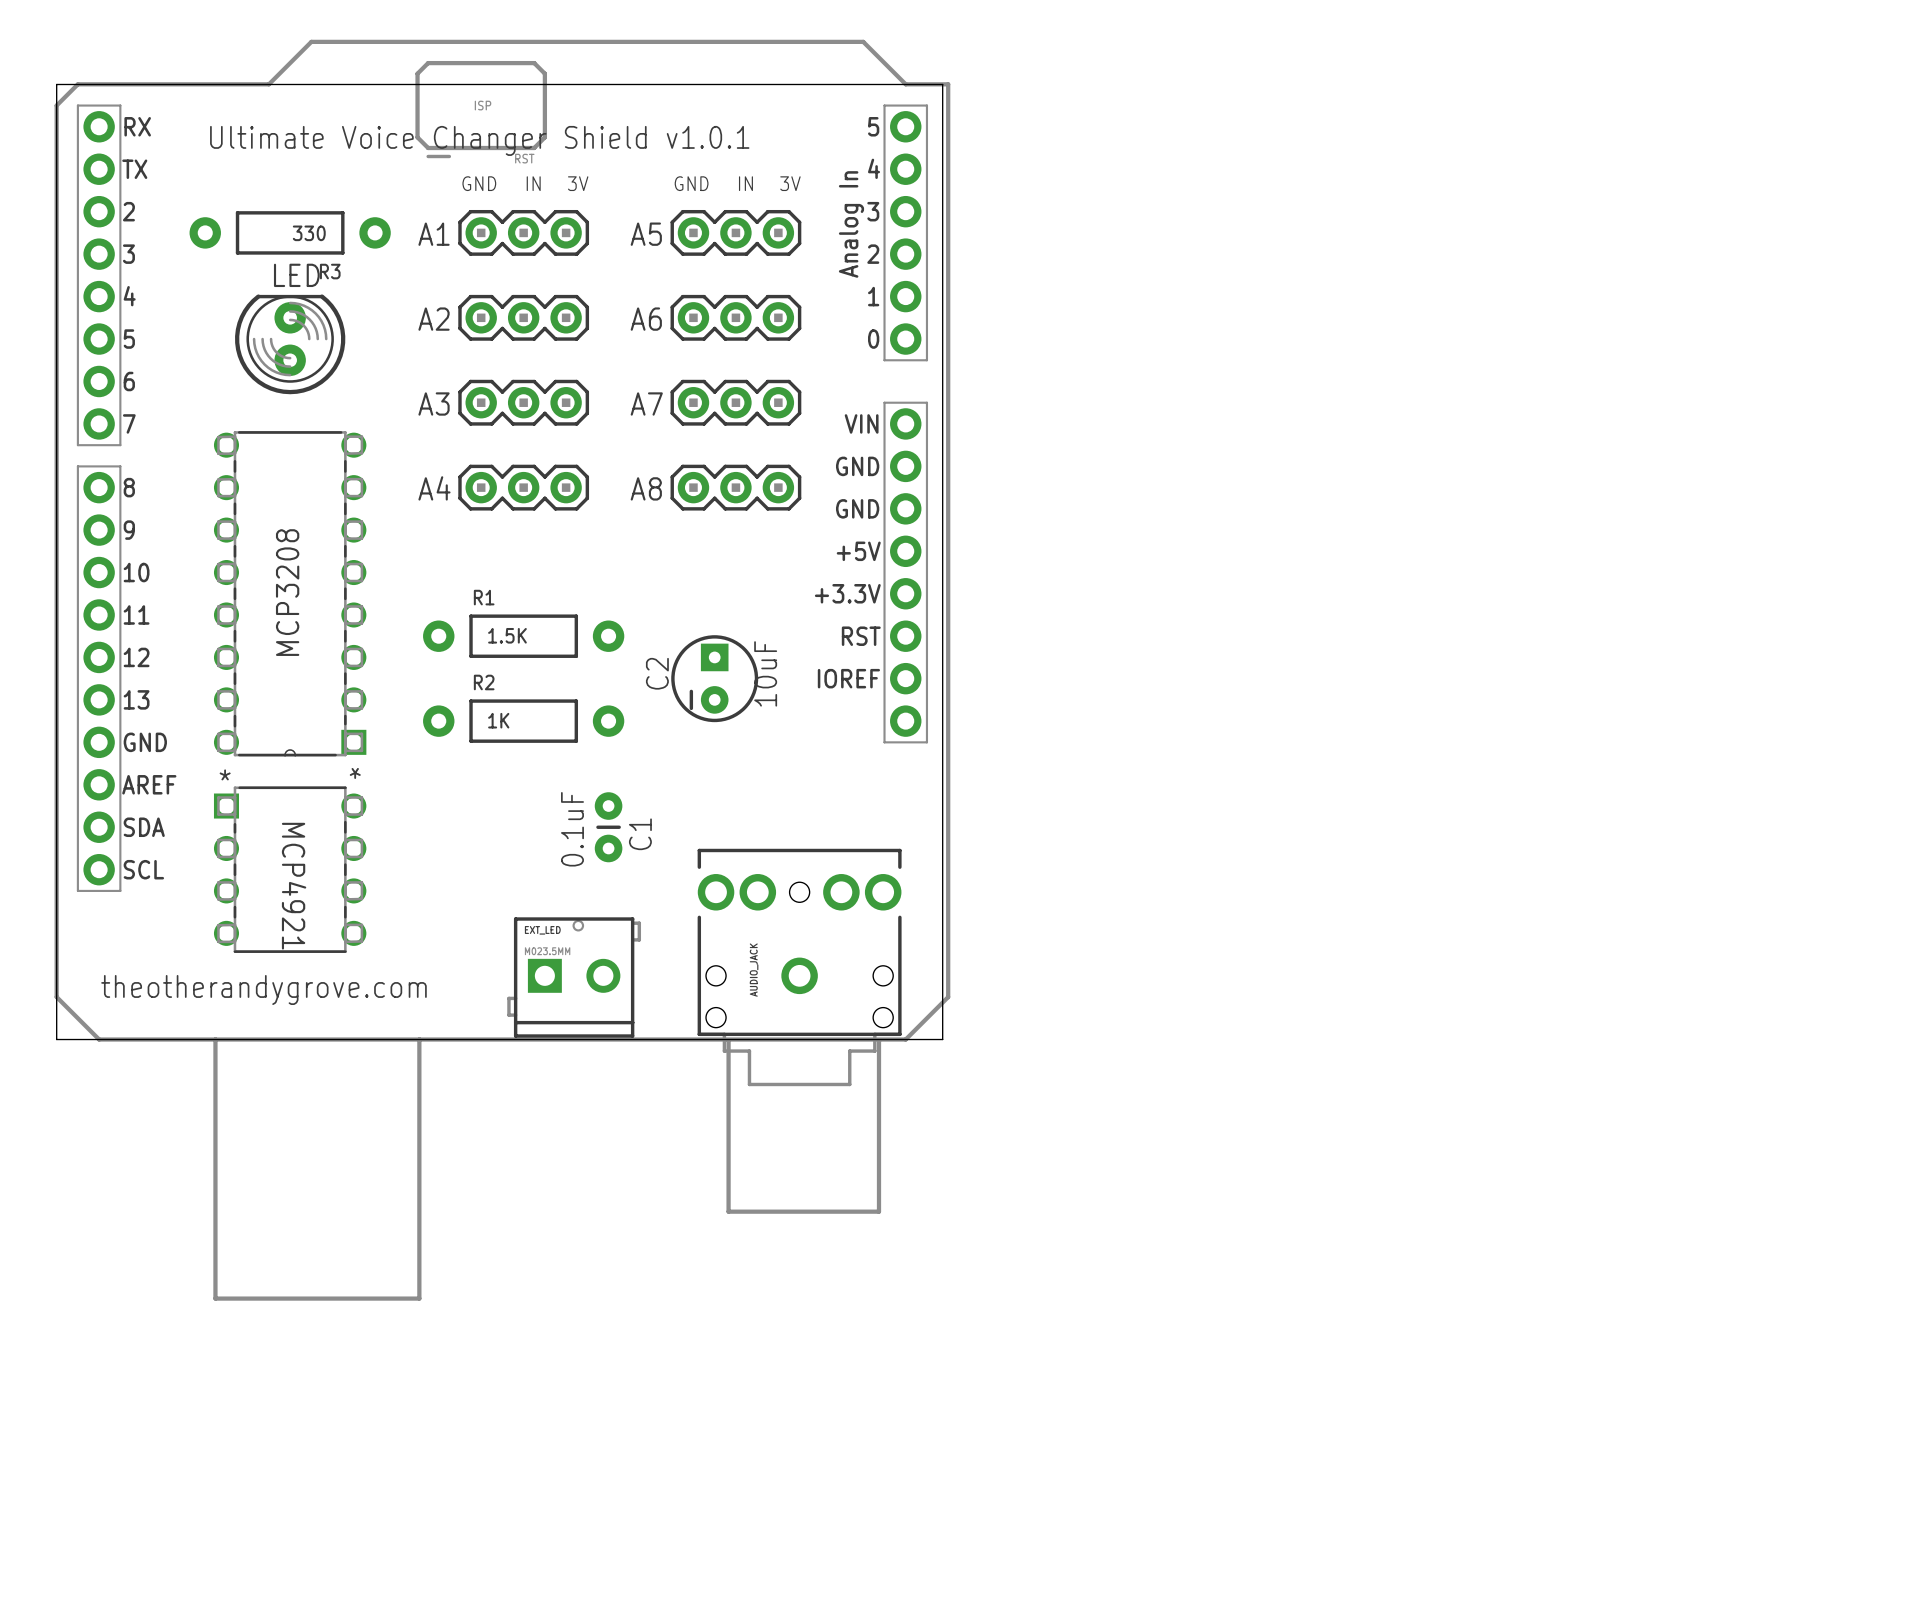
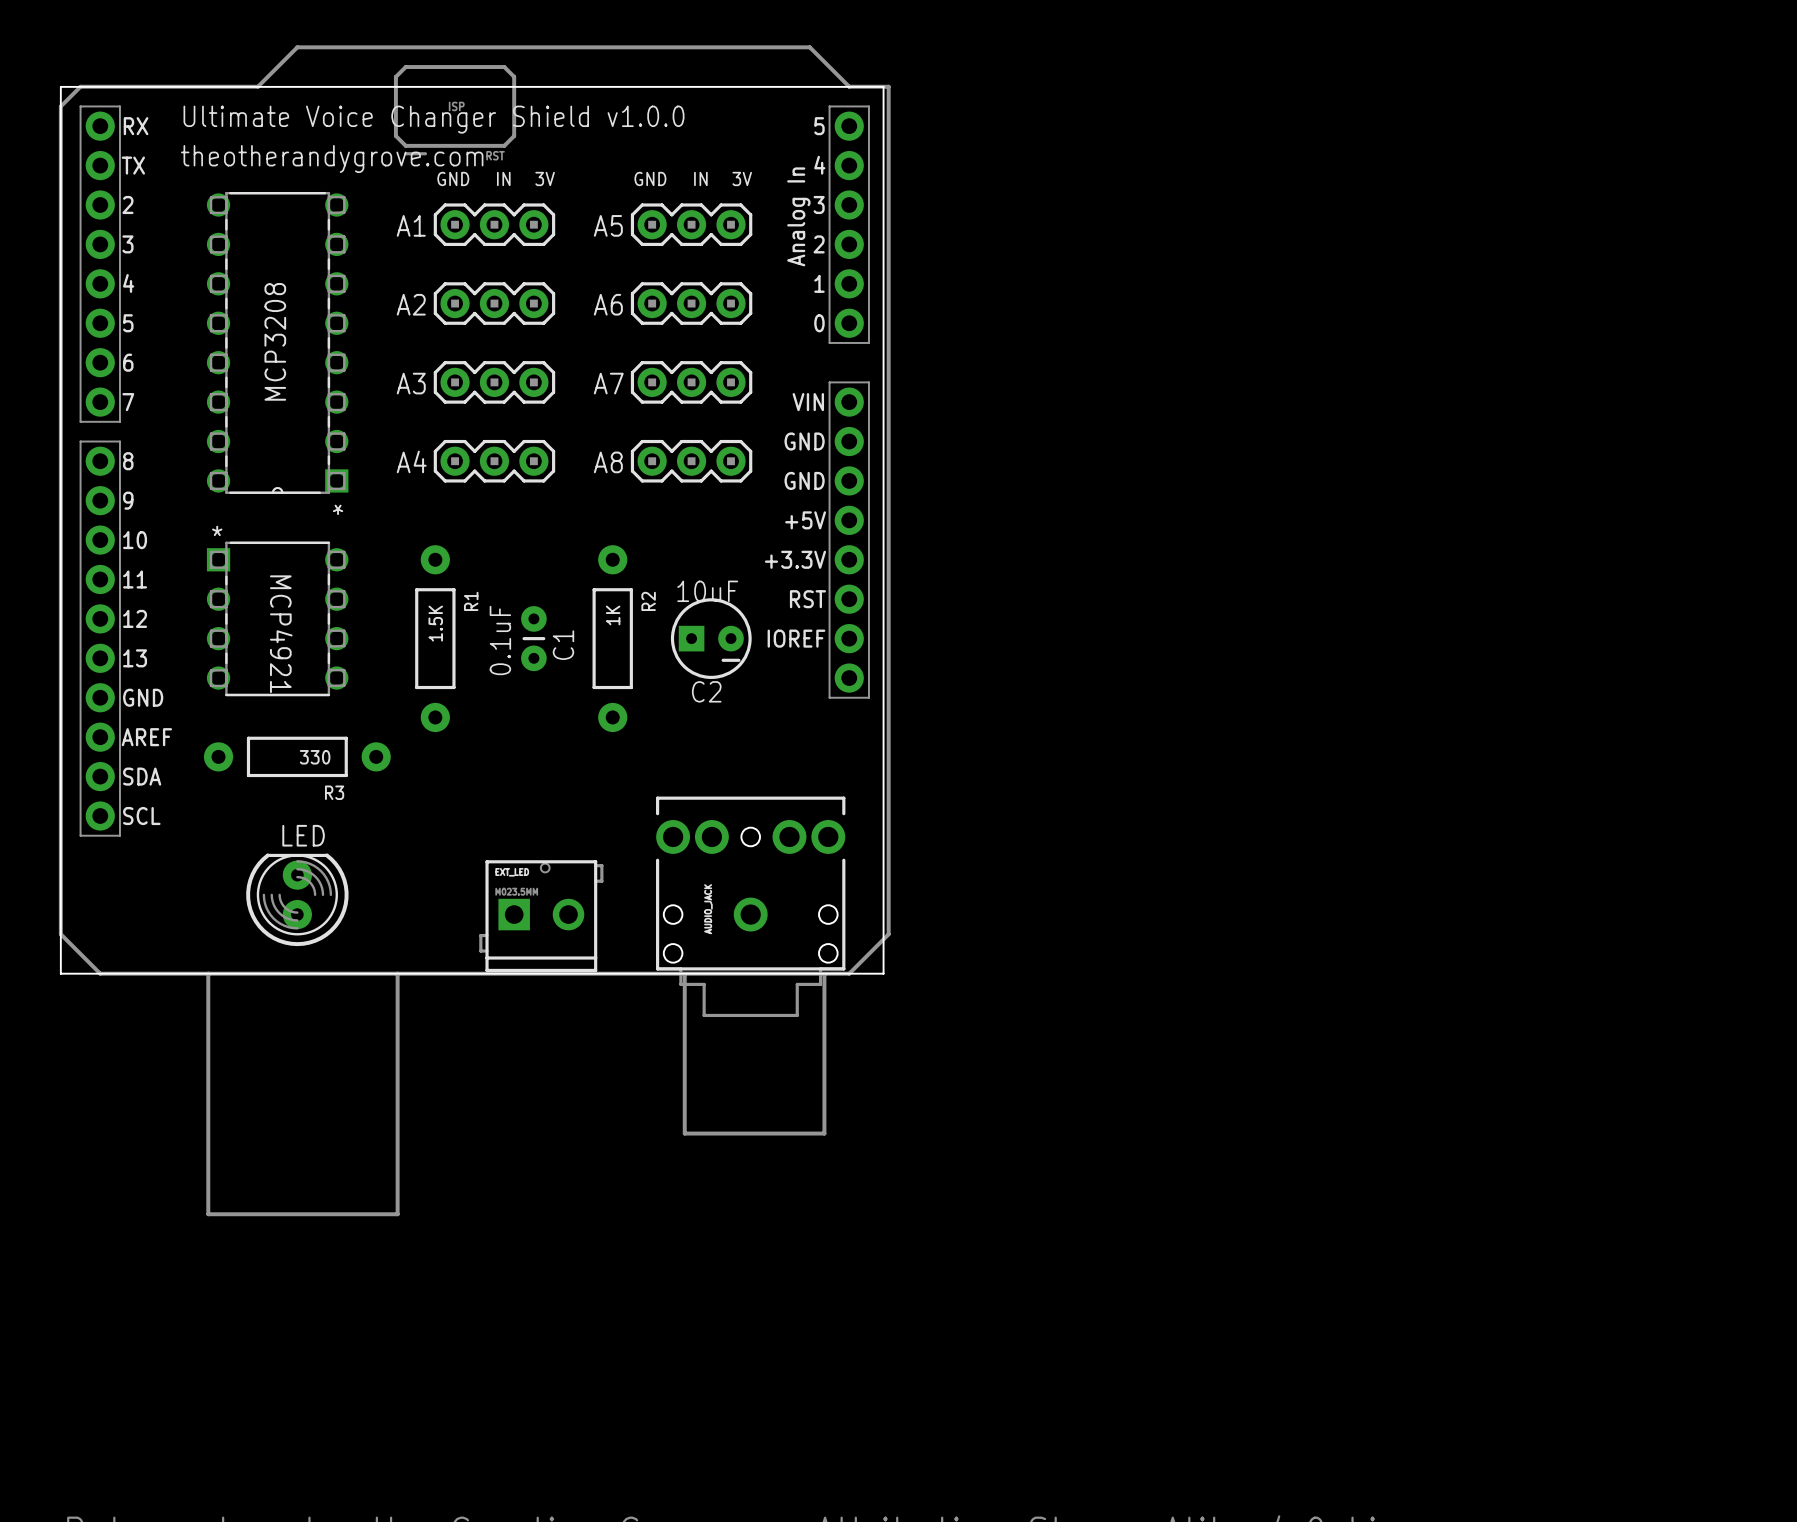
text: Ultimate Voice Changer Shield v1.0.1 (479, 140) -> Ultimate Voice Changer Shield v1.0.0 (433, 119)
text: none -> theotherandygrove.com (332, 159)
R3 position: (290, 232) -> (297, 756)
LED: (290, 344) -> none
MCP3208 position: (290, 593) -> (277, 342)
R1 rotation: 0° (523, 636) -> 90° clockwise (435, 638)
C2 rotation: 0° (714, 678) -> 90° counterclockwise (711, 638)
R2 rotation: 0° (523, 721) -> 90° clockwise (612, 638)
R2 position: (523, 721) -> (612, 638)
C1 position: (608, 827) -> (533, 638)
MCP4921 position: (290, 869) -> (277, 618)
LED: none -> (297, 899)
text: theotherandygrove.com (263, 989) -> none

